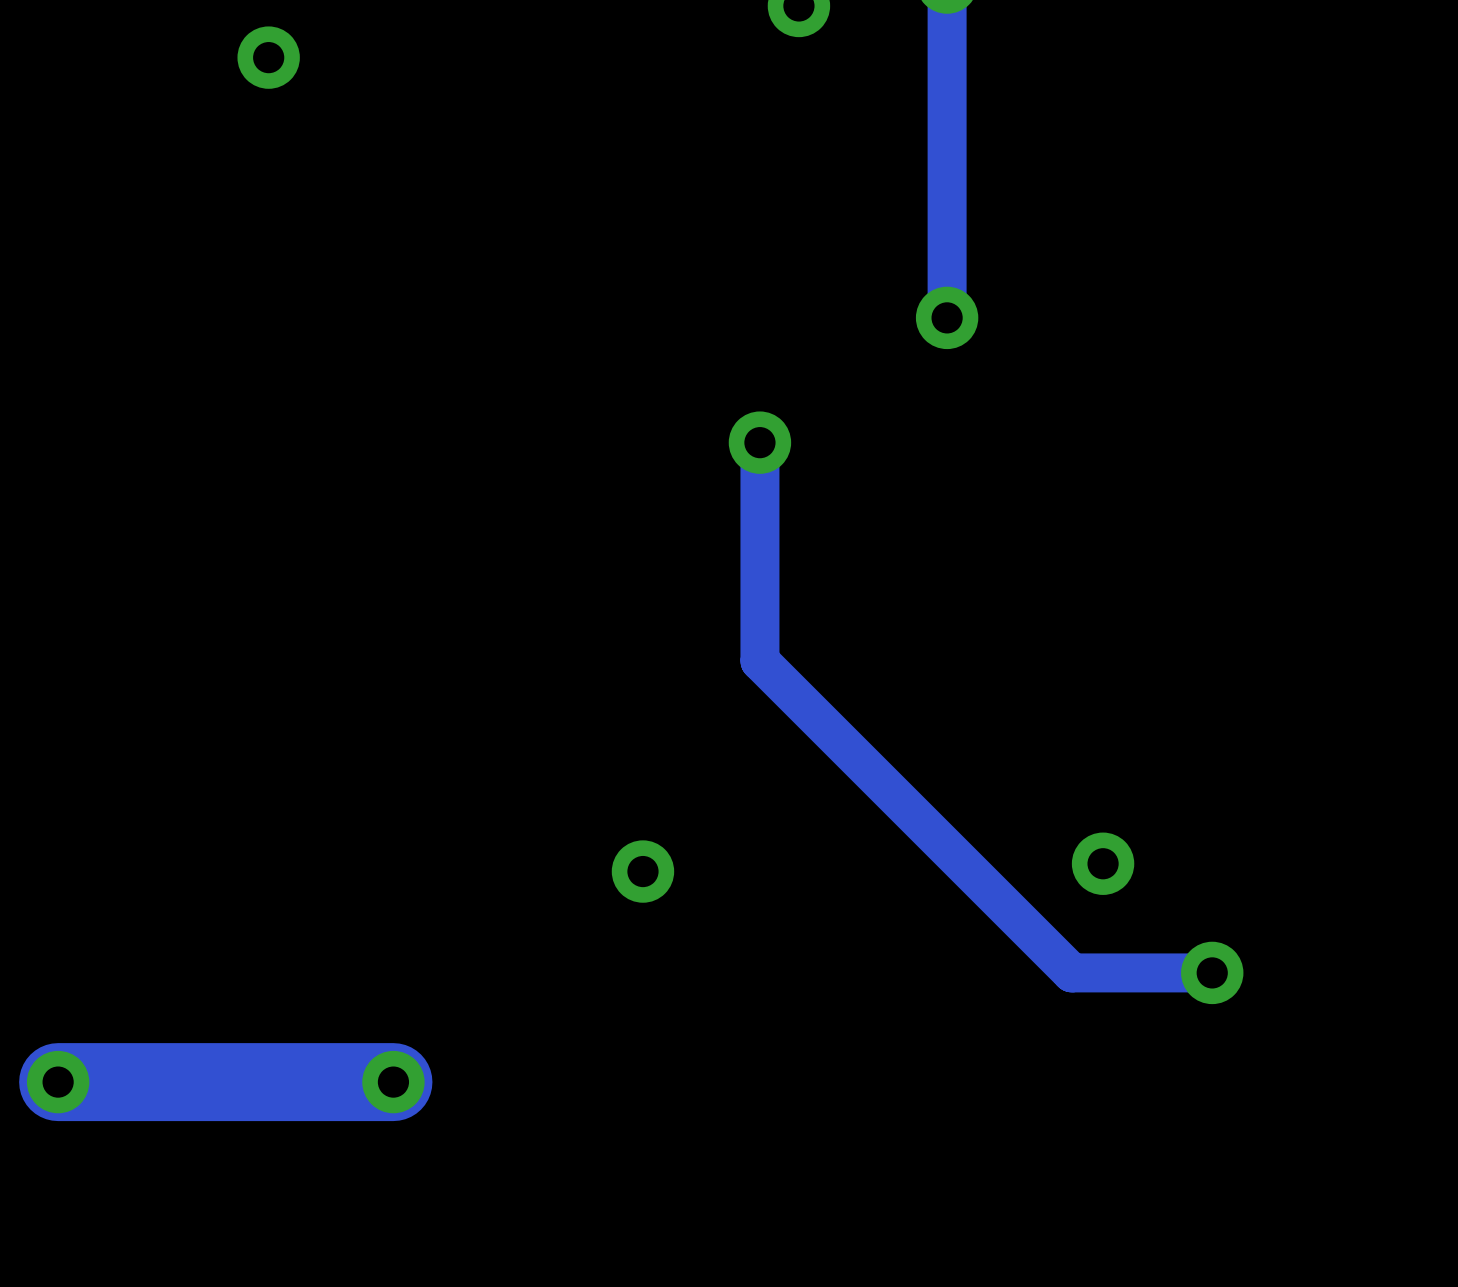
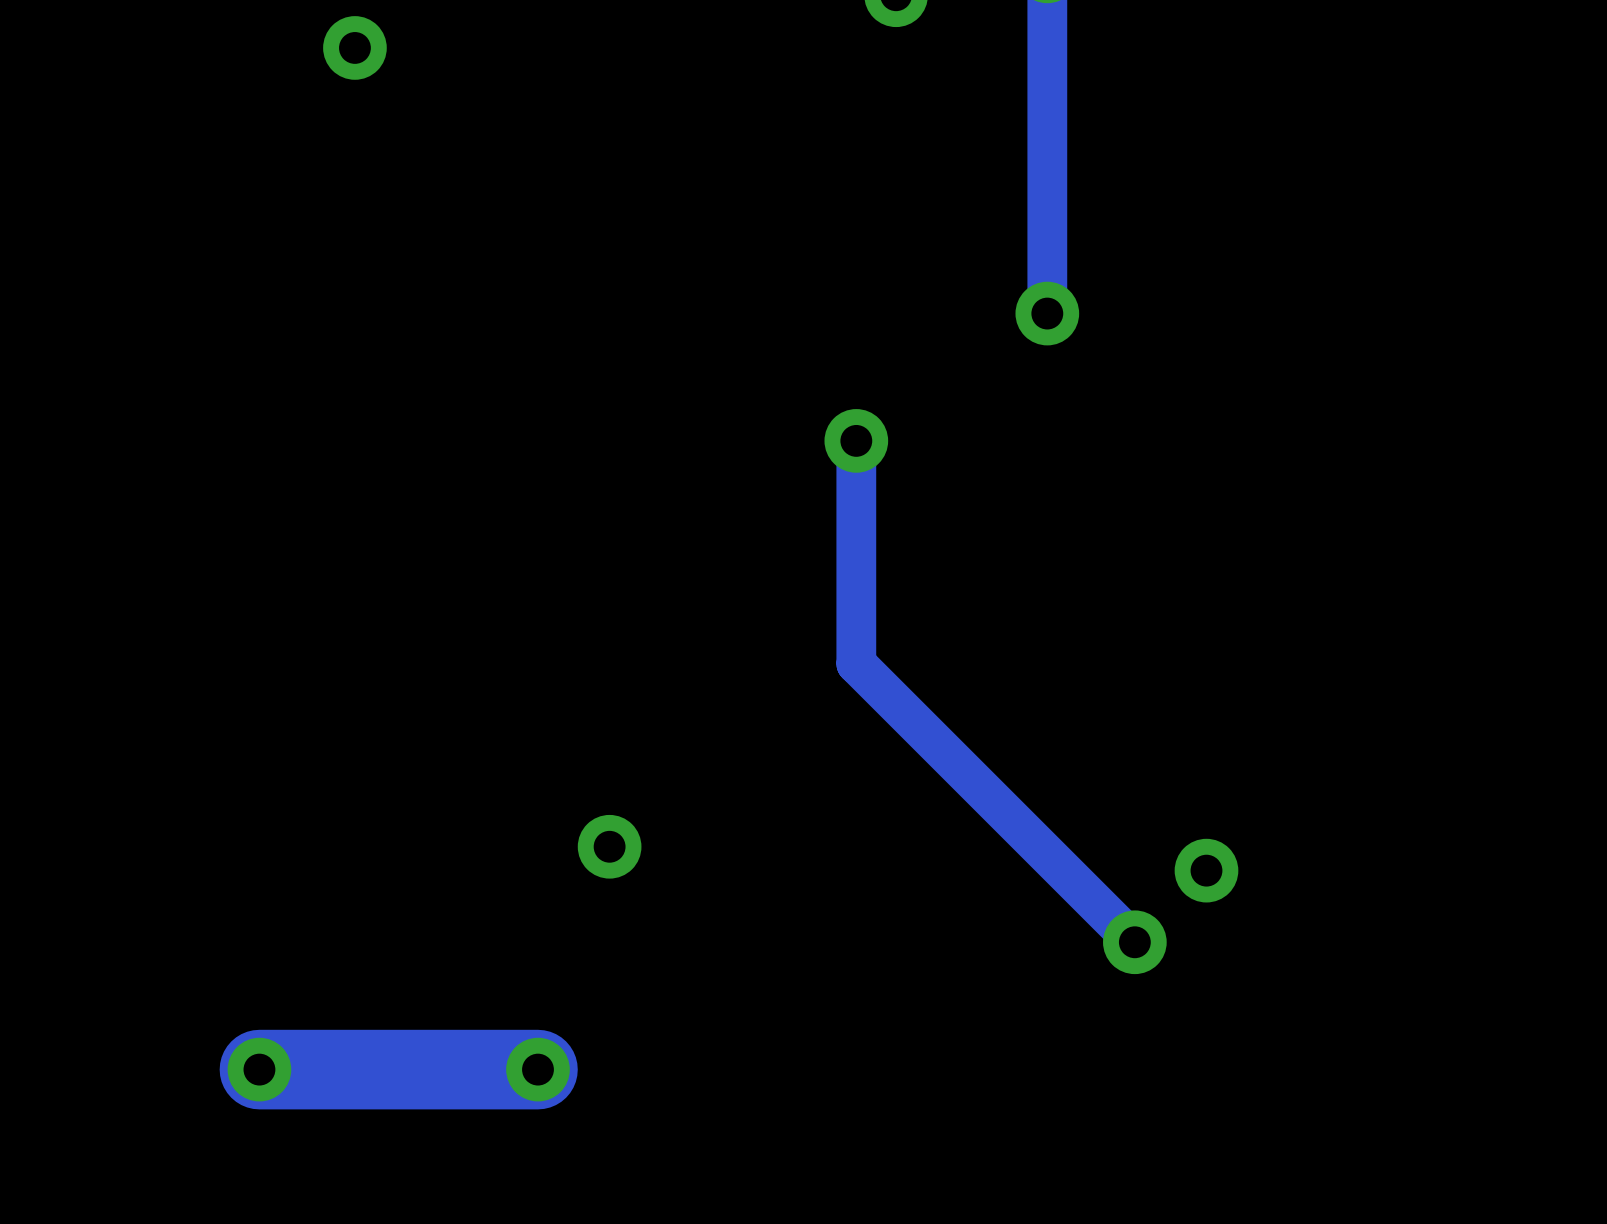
via position: (642, 871) -> (609, 846)
track: (1032, 933) (1071, 972) (1212, 972) -> none
via position: (1212, 972) -> (1134, 942)
via: none -> (259, 1069)
track: none -> (537, 1069) (259, 1069)
via: (58, 1082) -> none
track: (393, 1082) (58, 1082) -> none
via position: (393, 1082) -> (537, 1069)

